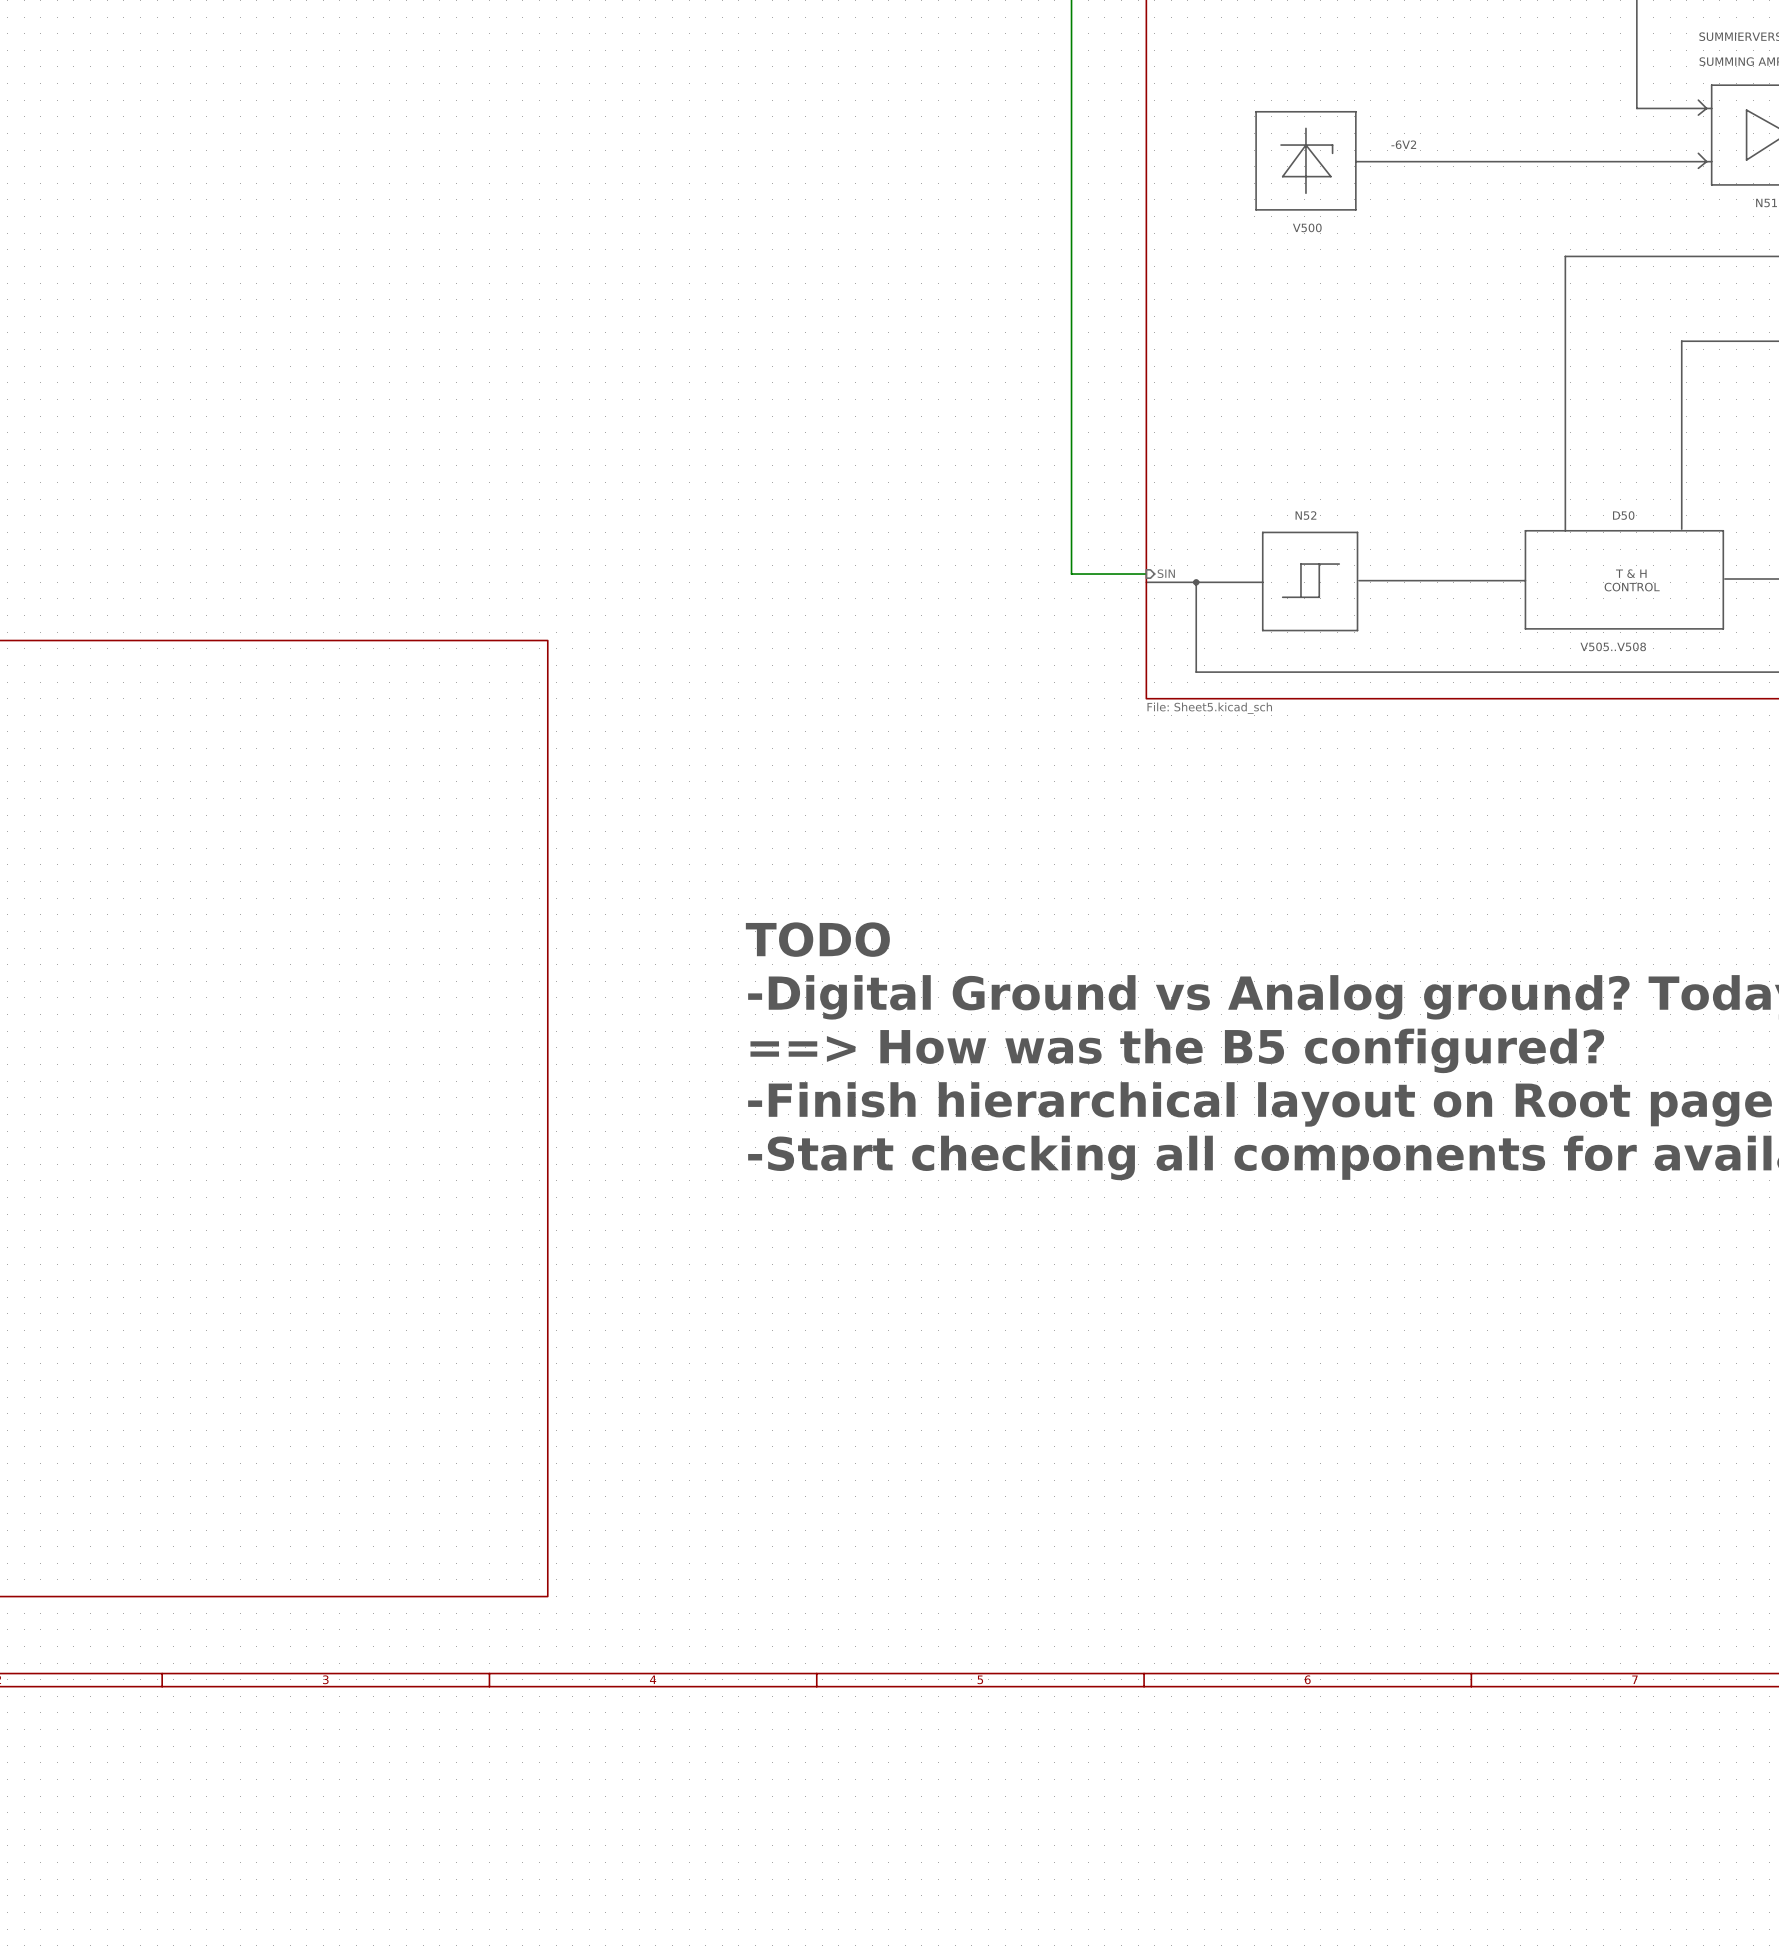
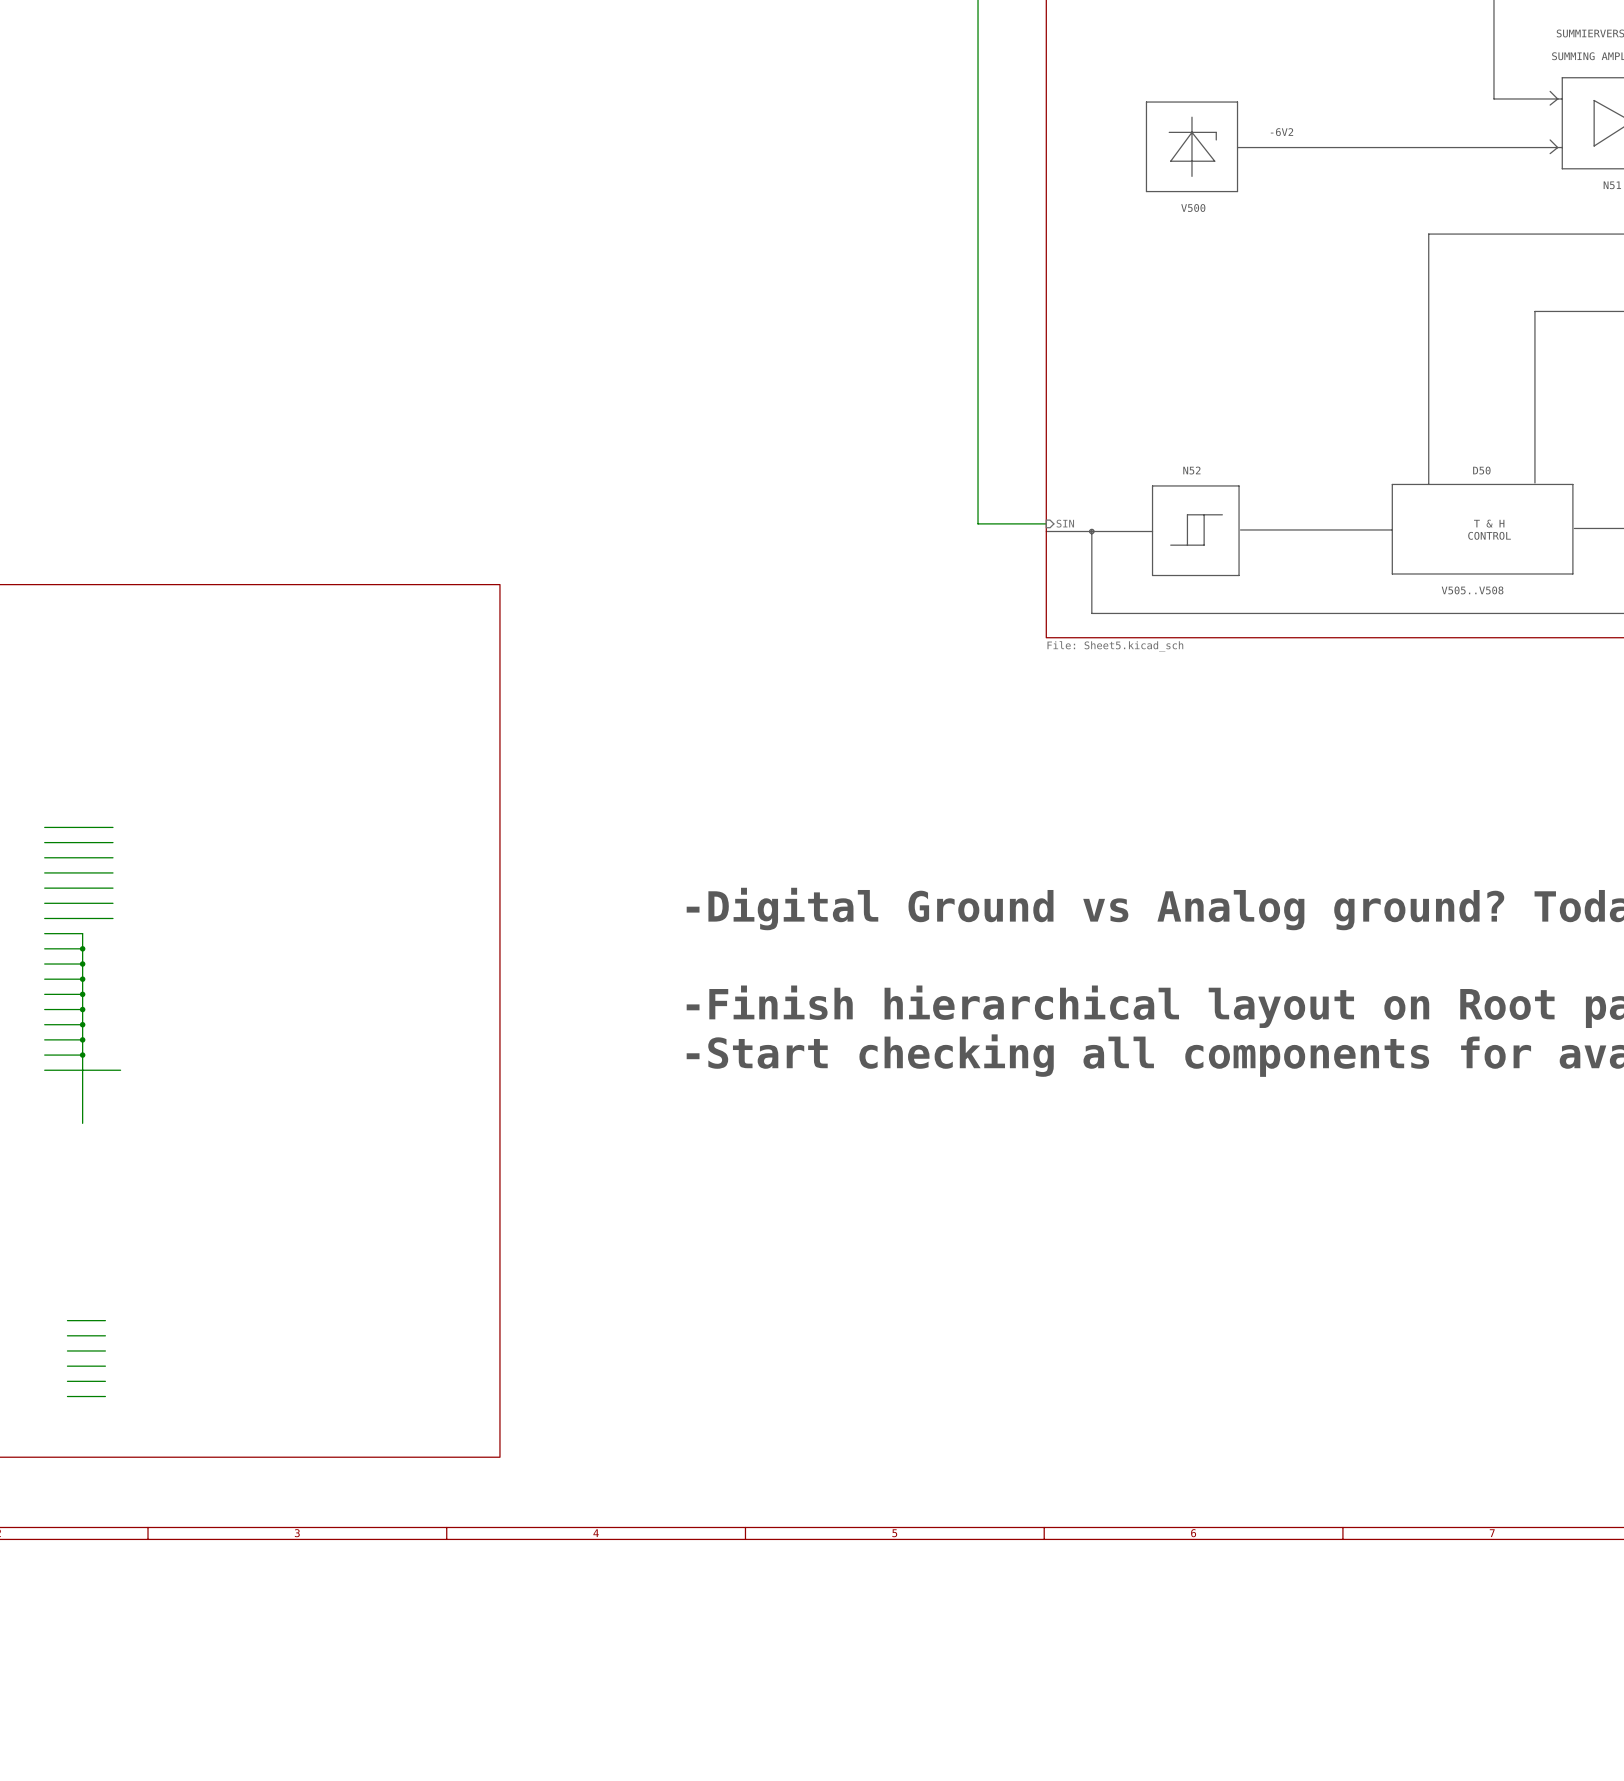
wire: none -> (44, 827) (112, 827)
wire: none -> (44, 842) (112, 842)
wire: none -> (44, 857) (112, 857)
text: TODO (817, 939) -> none
wire: none -> (44, 872) (112, 872)
wire: none -> (44, 888) (112, 888)
wire: none -> (44, 903) (112, 903)
wire: none -> (44, 918) (112, 918)
wire: none -> (44, 933) (82, 933) (82, 1123)
wire: none -> (44, 948) (82, 948)
junction: none -> (82, 948)
text: ==> How was the B5 configured? (1177, 1050) -> none
wire: none -> (44, 964) (82, 964)
junction: none -> (82, 964)
wire: none -> (44, 979) (82, 979)
junction: none -> (82, 979)
wire: none -> (44, 994) (82, 994)
junction: none -> (82, 994)
wire: none -> (44, 1009) (82, 1009)
junction: none -> (82, 1009)
wire: none -> (44, 1024) (82, 1024)
junction: none -> (82, 1024)
wire: none -> (44, 1039) (82, 1039)
junction: none -> (82, 1039)
wire: none -> (44, 1055) (82, 1055)
junction: none -> (82, 1055)
wire: none -> (44, 1070) (120, 1070)
wire: none -> (67, 1320) (105, 1320)
wire: none -> (67, 1335) (105, 1335)
wire: none -> (67, 1350) (105, 1350)
wire: none -> (67, 1366) (105, 1366)
wire: none -> (67, 1381) (105, 1381)
wire: none -> (67, 1396) (105, 1396)

